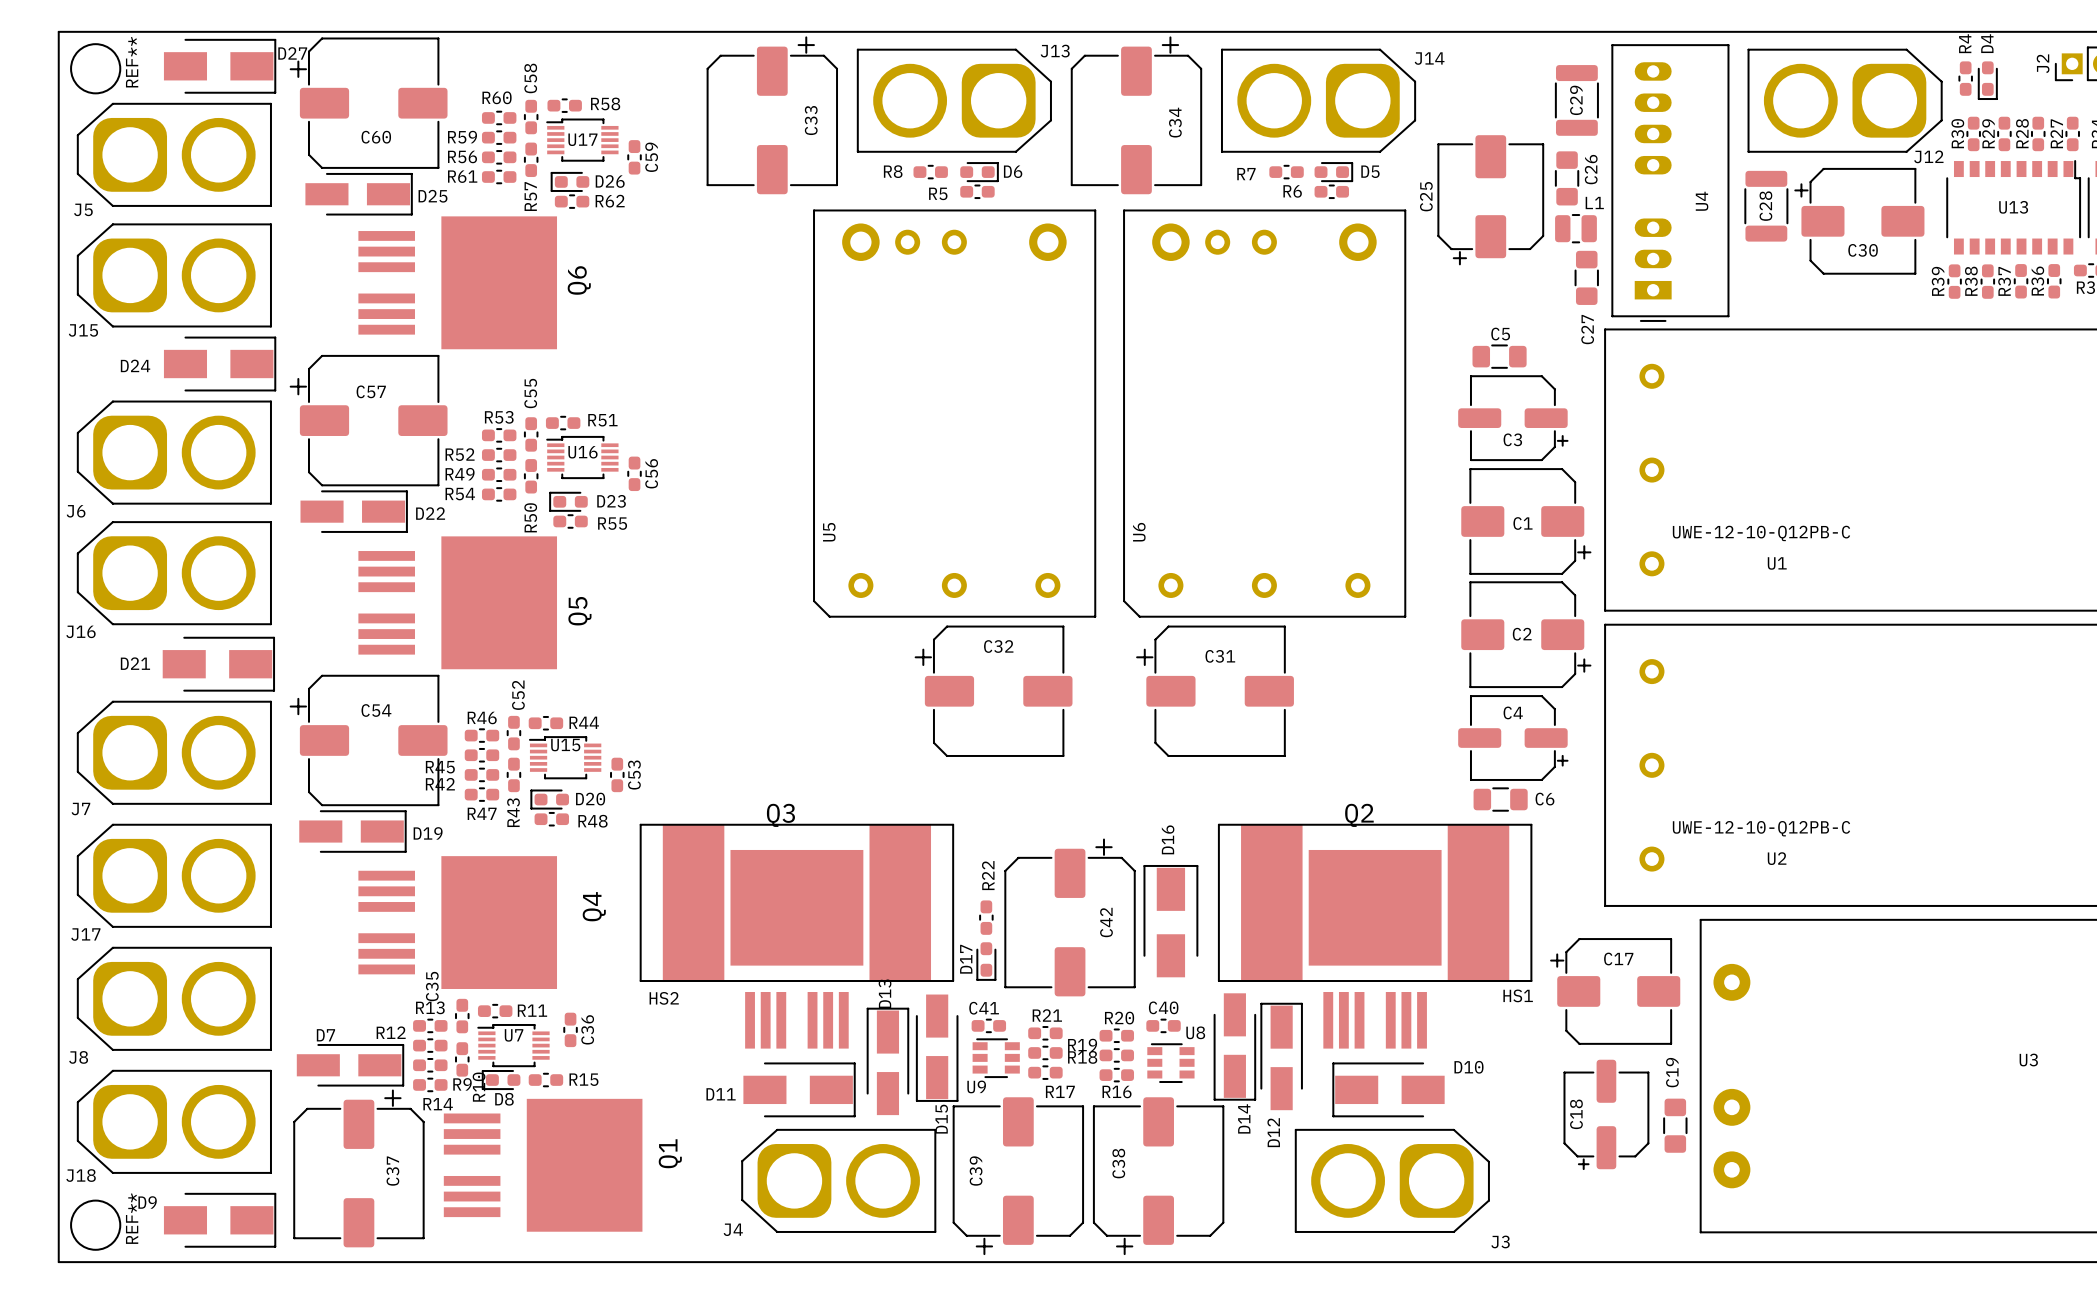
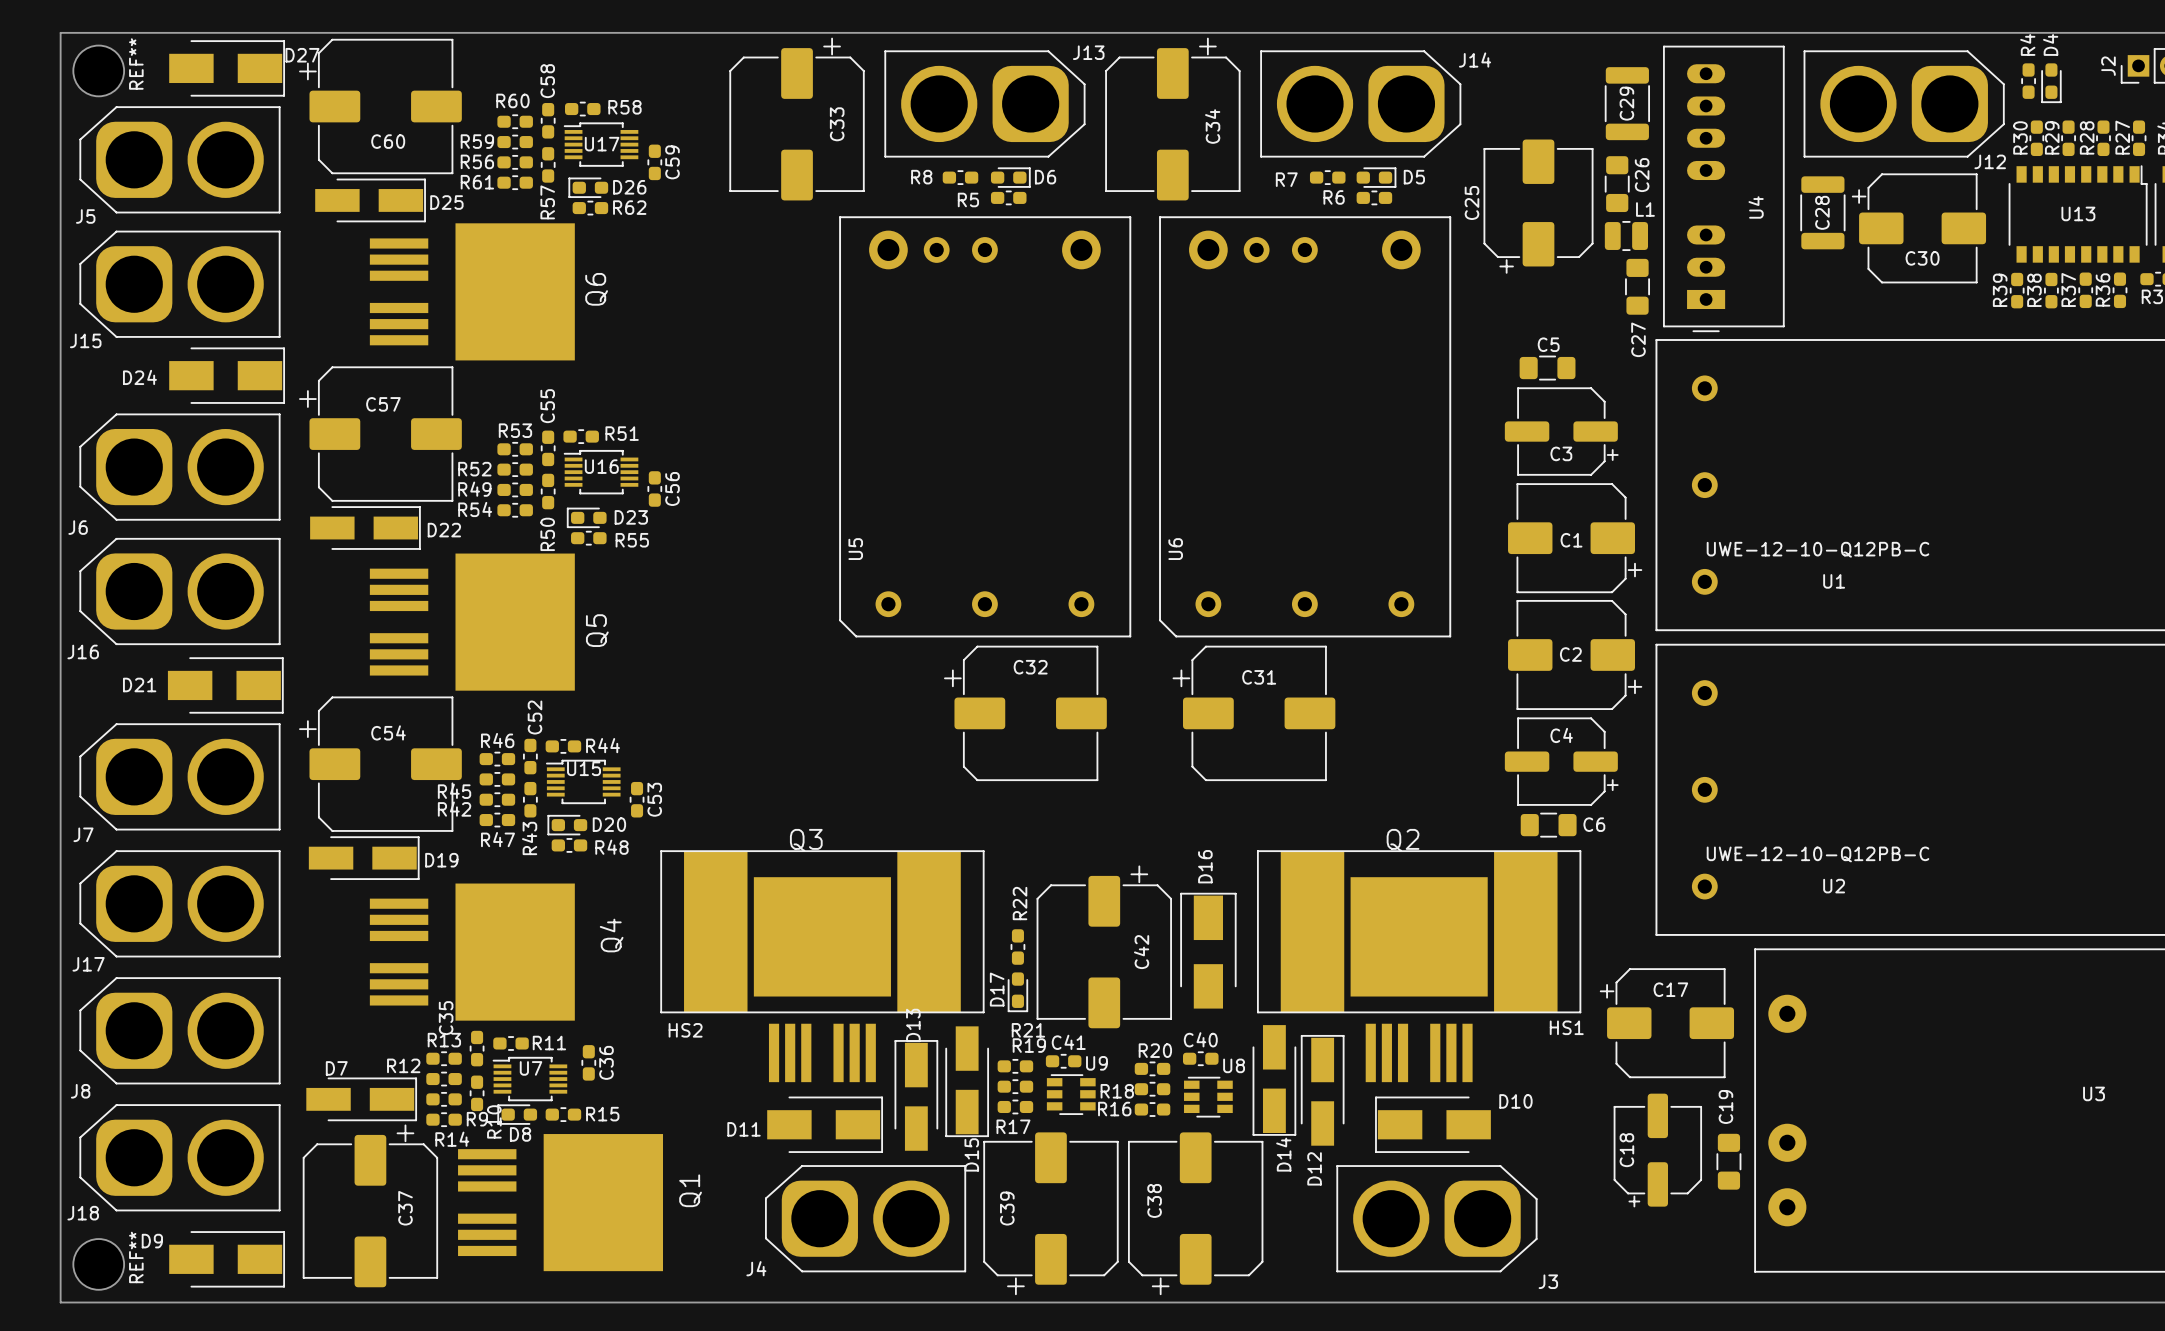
C41 name position: C41 (984, 1008) -> C41 (1068, 1042)
R21 name position: R21 (1047, 1015) -> R21 (1028, 1030)
C41 position: (988, 1025) -> (1063, 1061)
R21 position: (1045, 1033) -> (1015, 1066)
R19 name position: R19 (1082, 1045) -> R19 (1029, 1045)
R19 position: (1045, 1052) -> (1015, 1086)
U9 position: (996, 1058) -> (1071, 1094)
R17 position: (1045, 1072) -> (1015, 1106)
U9 name position: U9 (976, 1086) -> U9 (1096, 1063)
R17 name position: R17 (1060, 1091) -> R17 (1013, 1126)
R16 name position: R16 (1117, 1091) -> R16 (1114, 1109)

